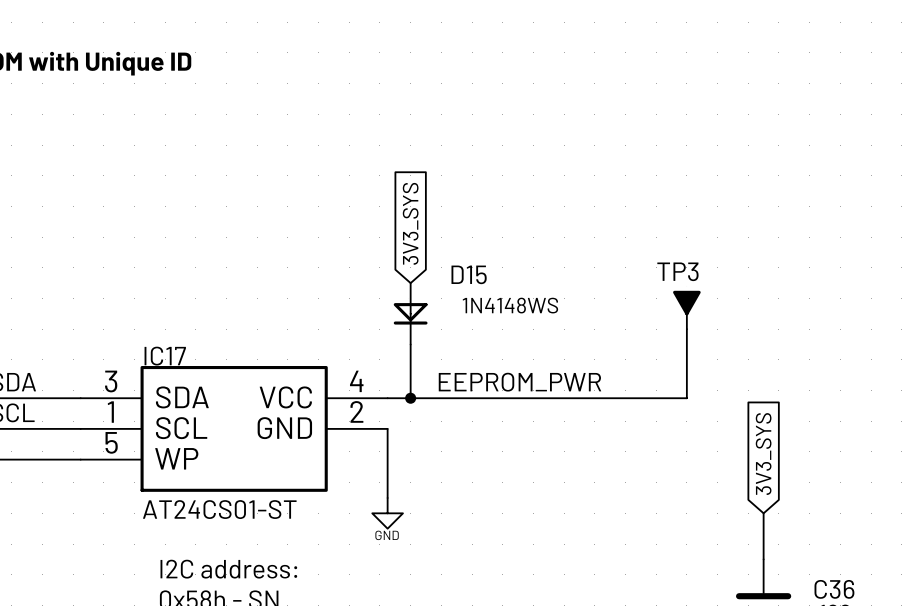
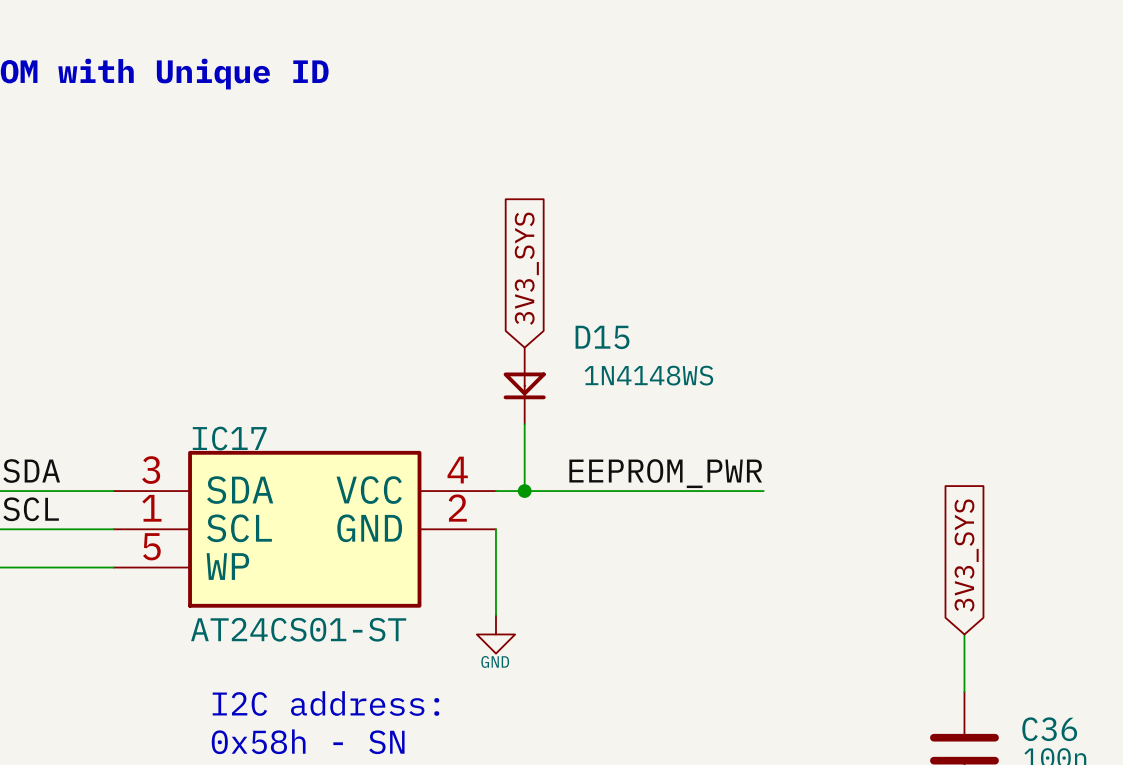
TP3: (686, 309) -> none
wire: (686, 329) (686, 398) (602, 398) -> none

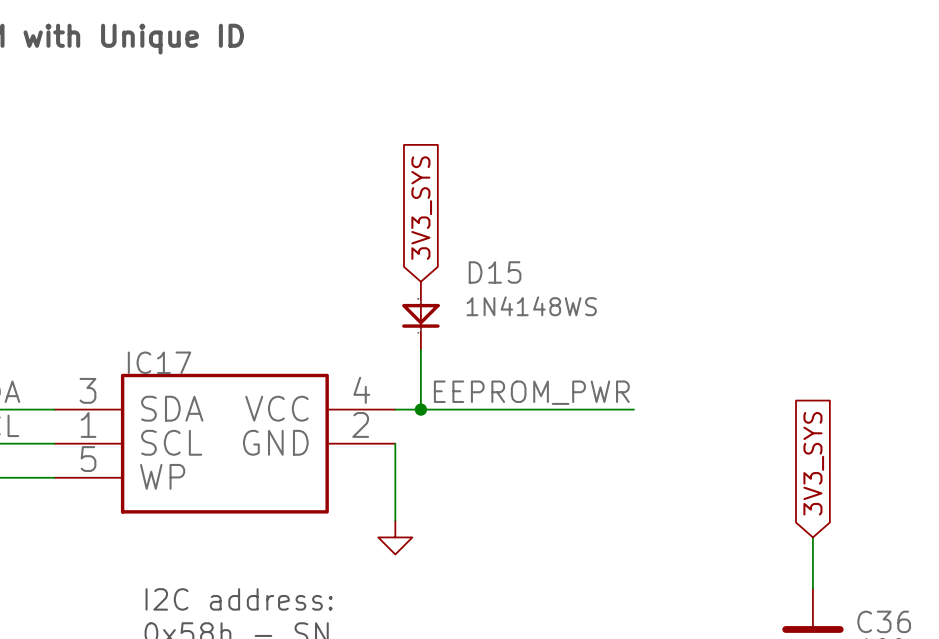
IC17 value: AT24CS01-ST (298, 629) -> none
power symbol text: GND (495, 661) -> none

